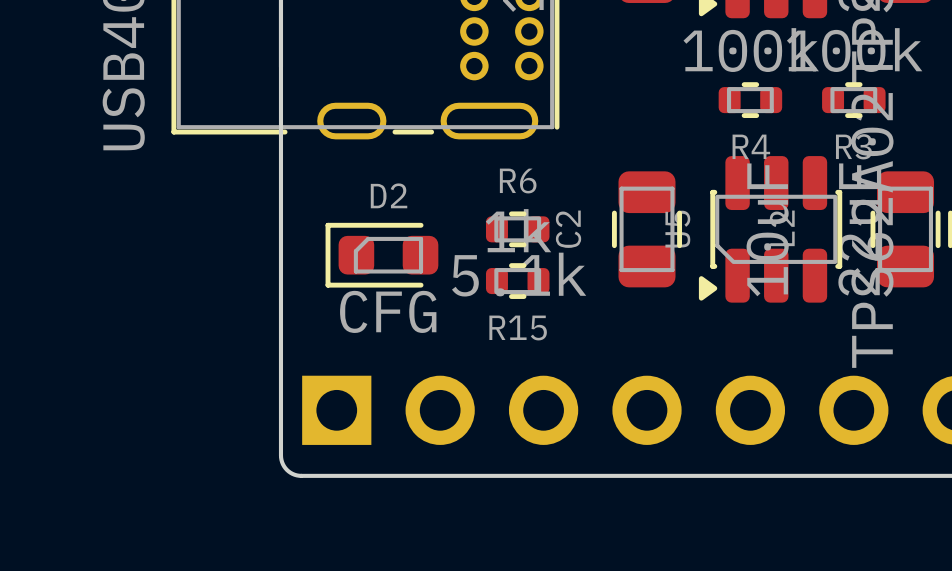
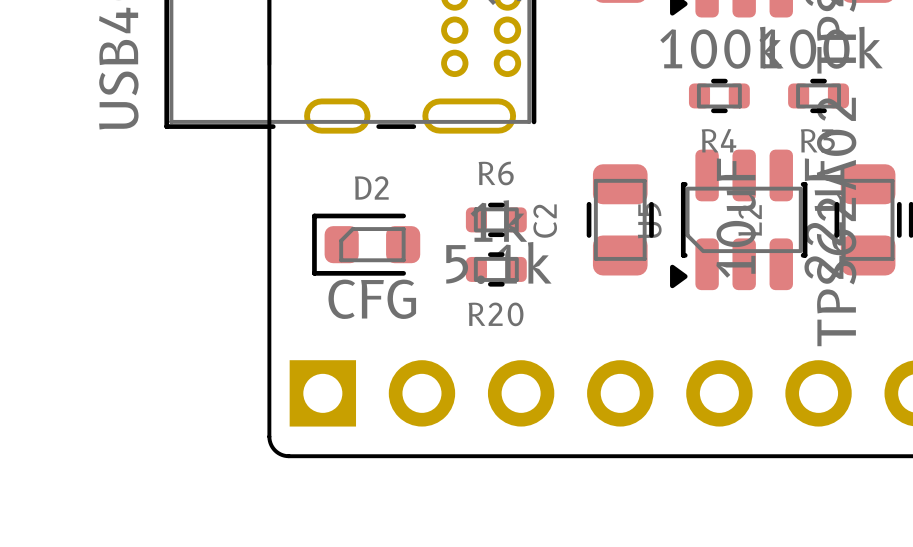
R15 name: R15 (518, 327) -> R20 (496, 314)

